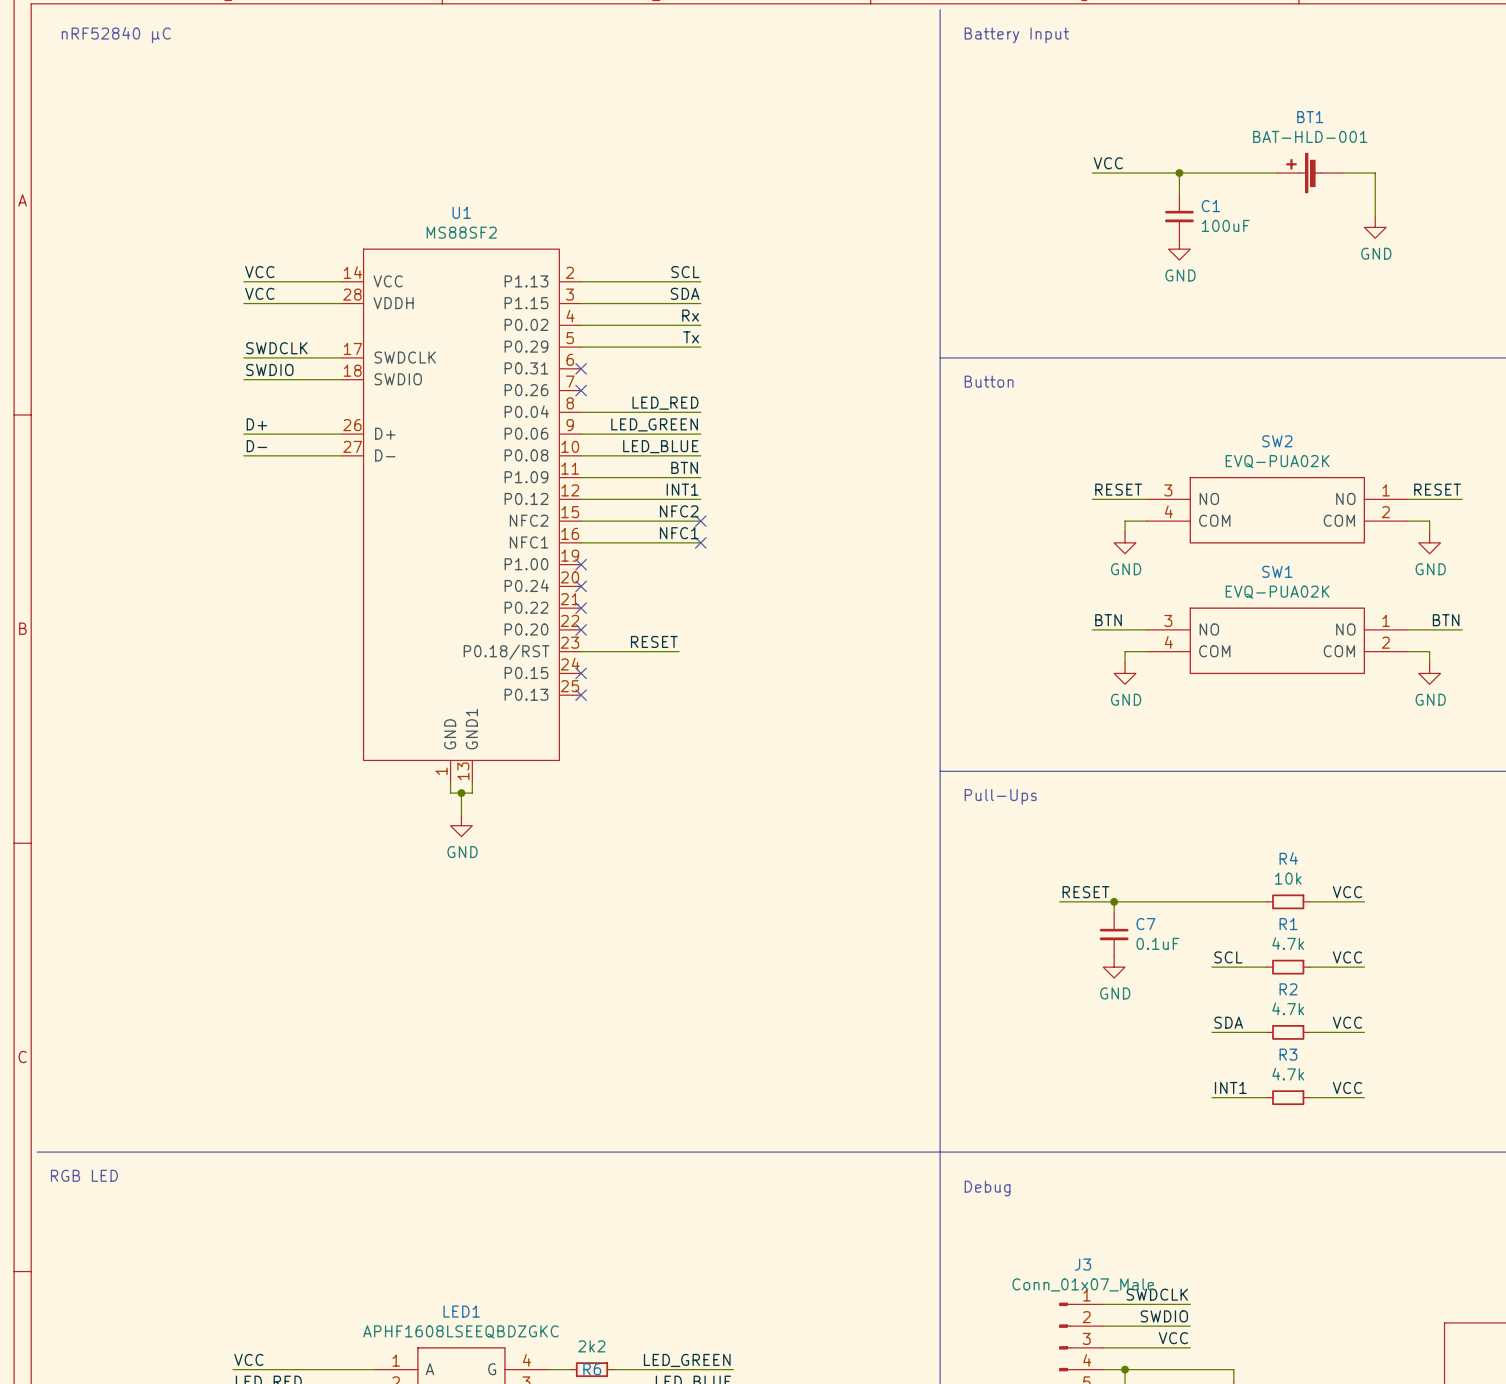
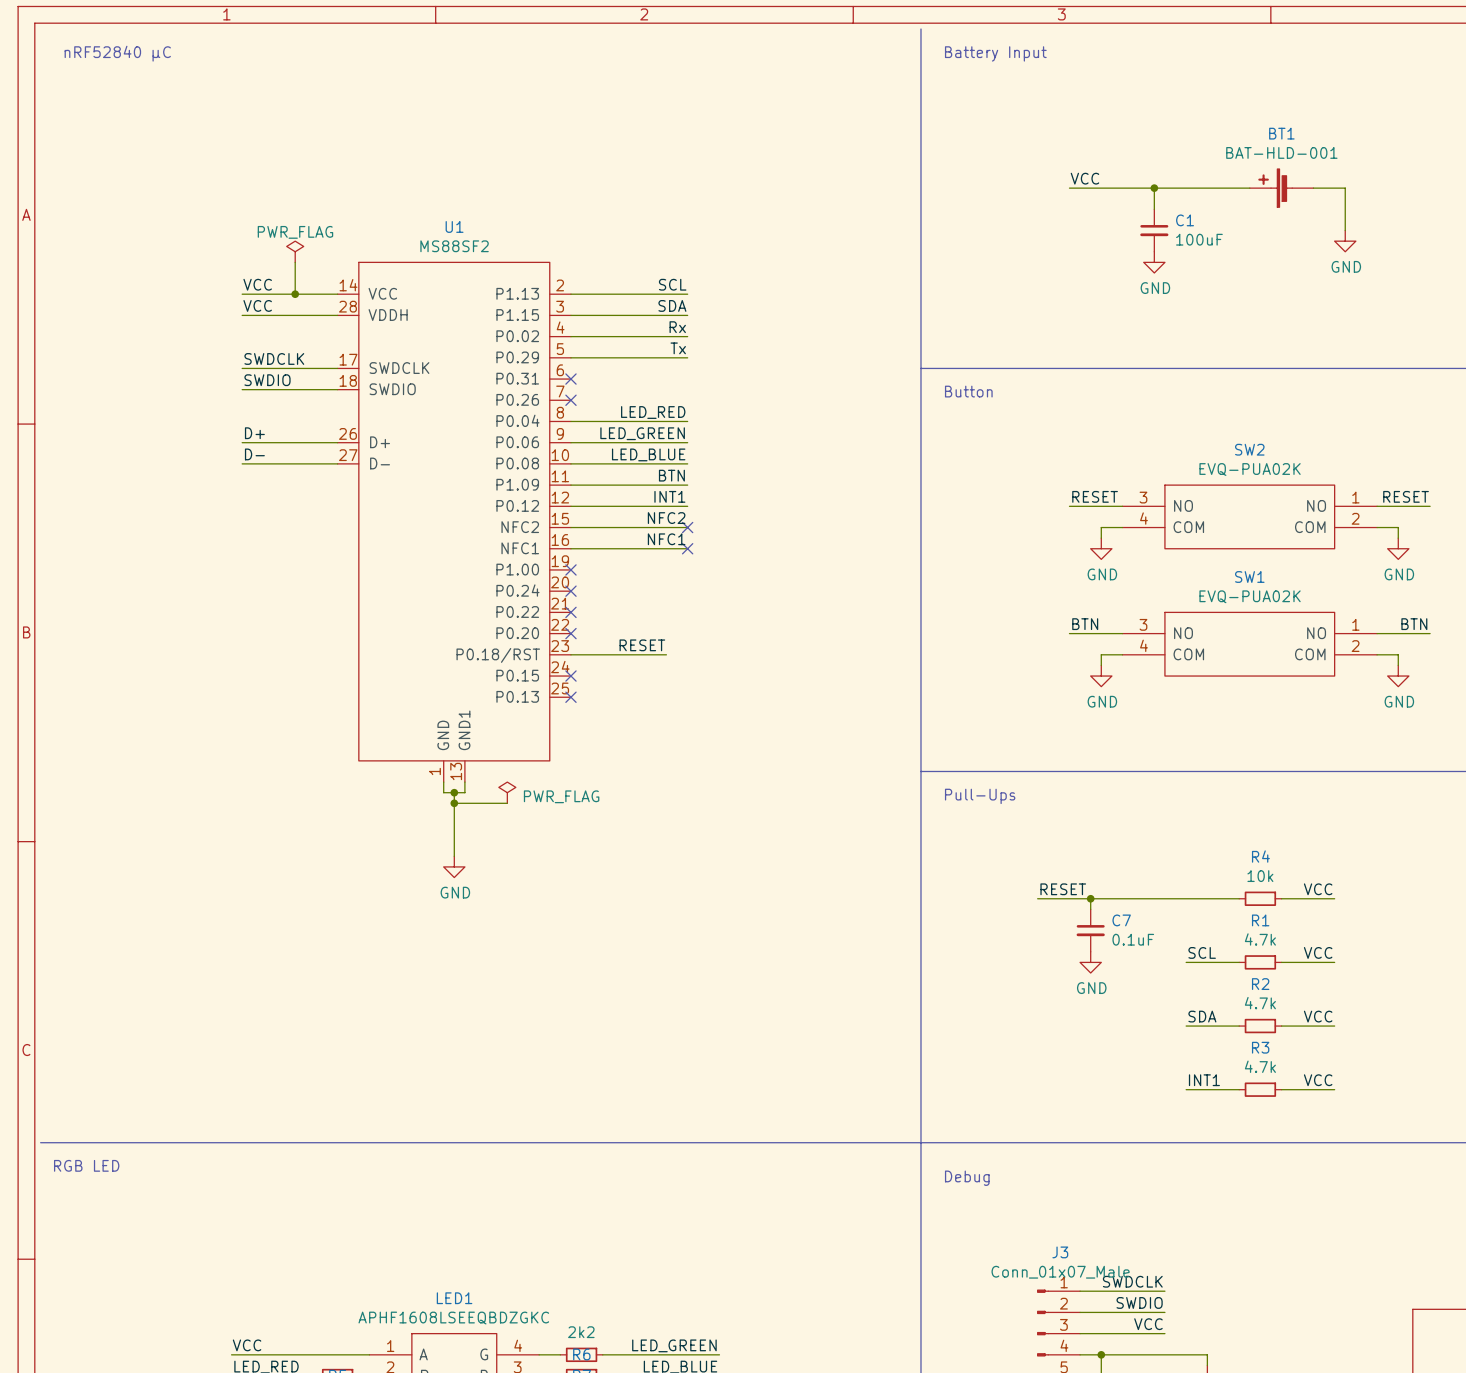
power symbol: none -> PWR_FLAG (295, 251)
wire: none -> (295, 262) (295, 294)
junction: none -> (295, 294)
power symbol: none -> PWR_FLAG (507, 792)
wire: none -> (454, 803) (507, 803)
junction: none -> (454, 803)
wire: none -> (454, 813) (454, 856)
power symbol position: GND (461, 825) -> GND (454, 866)

